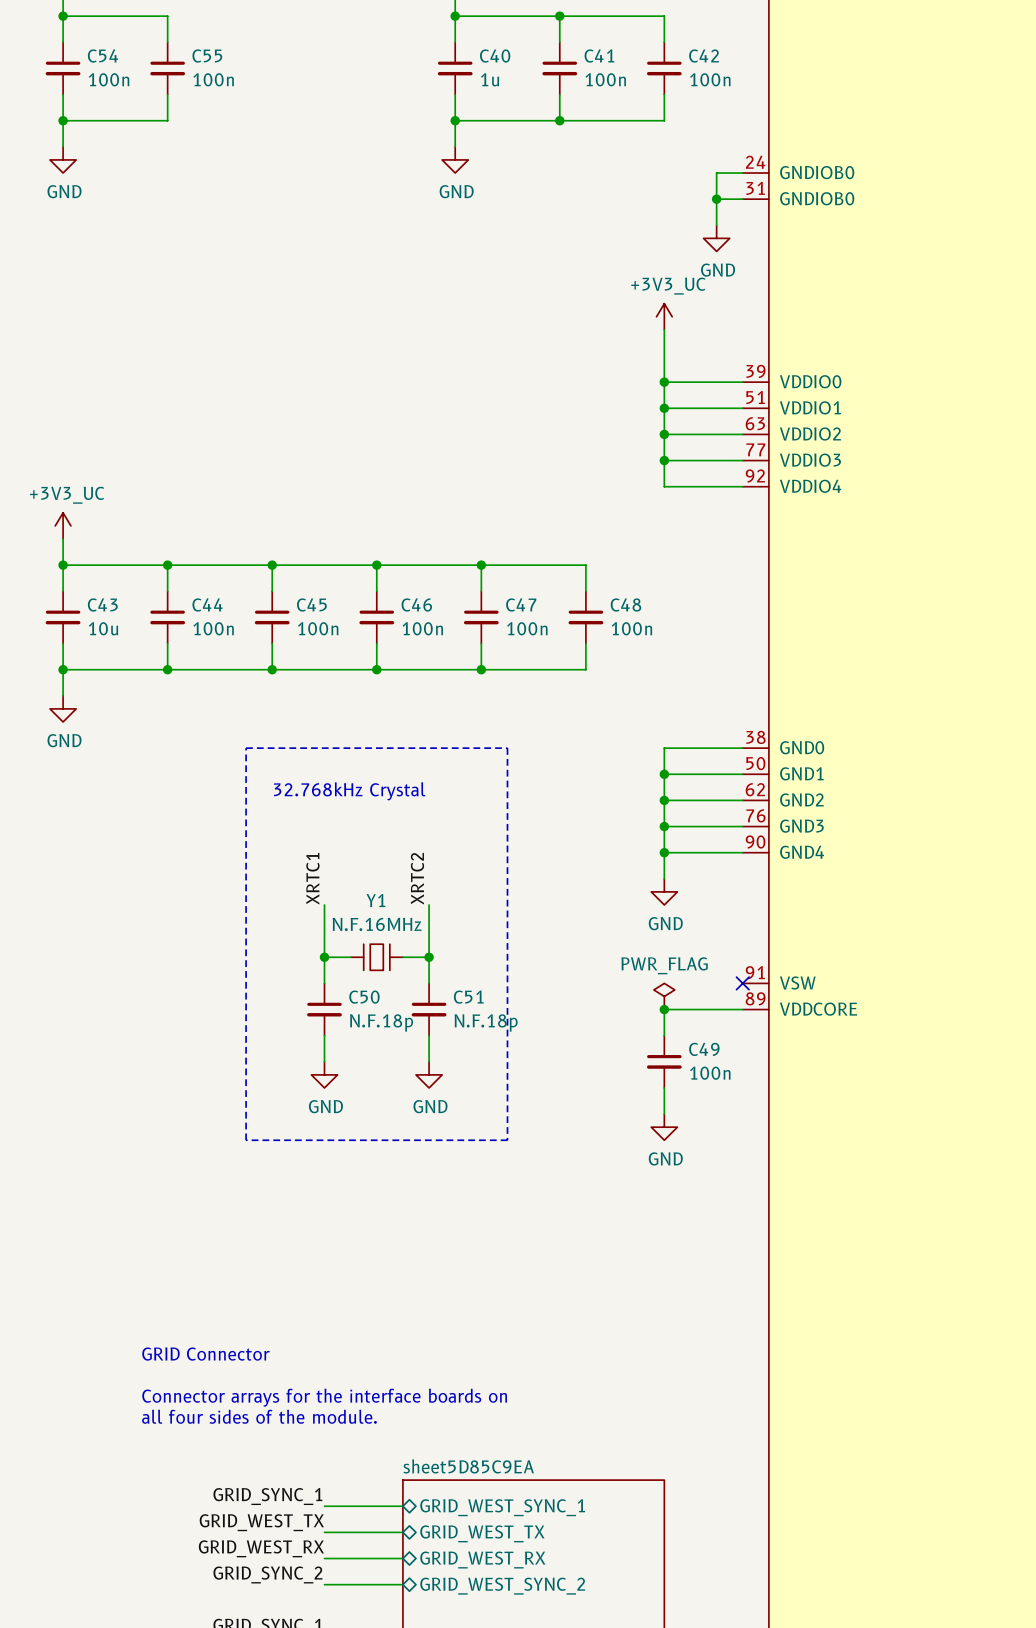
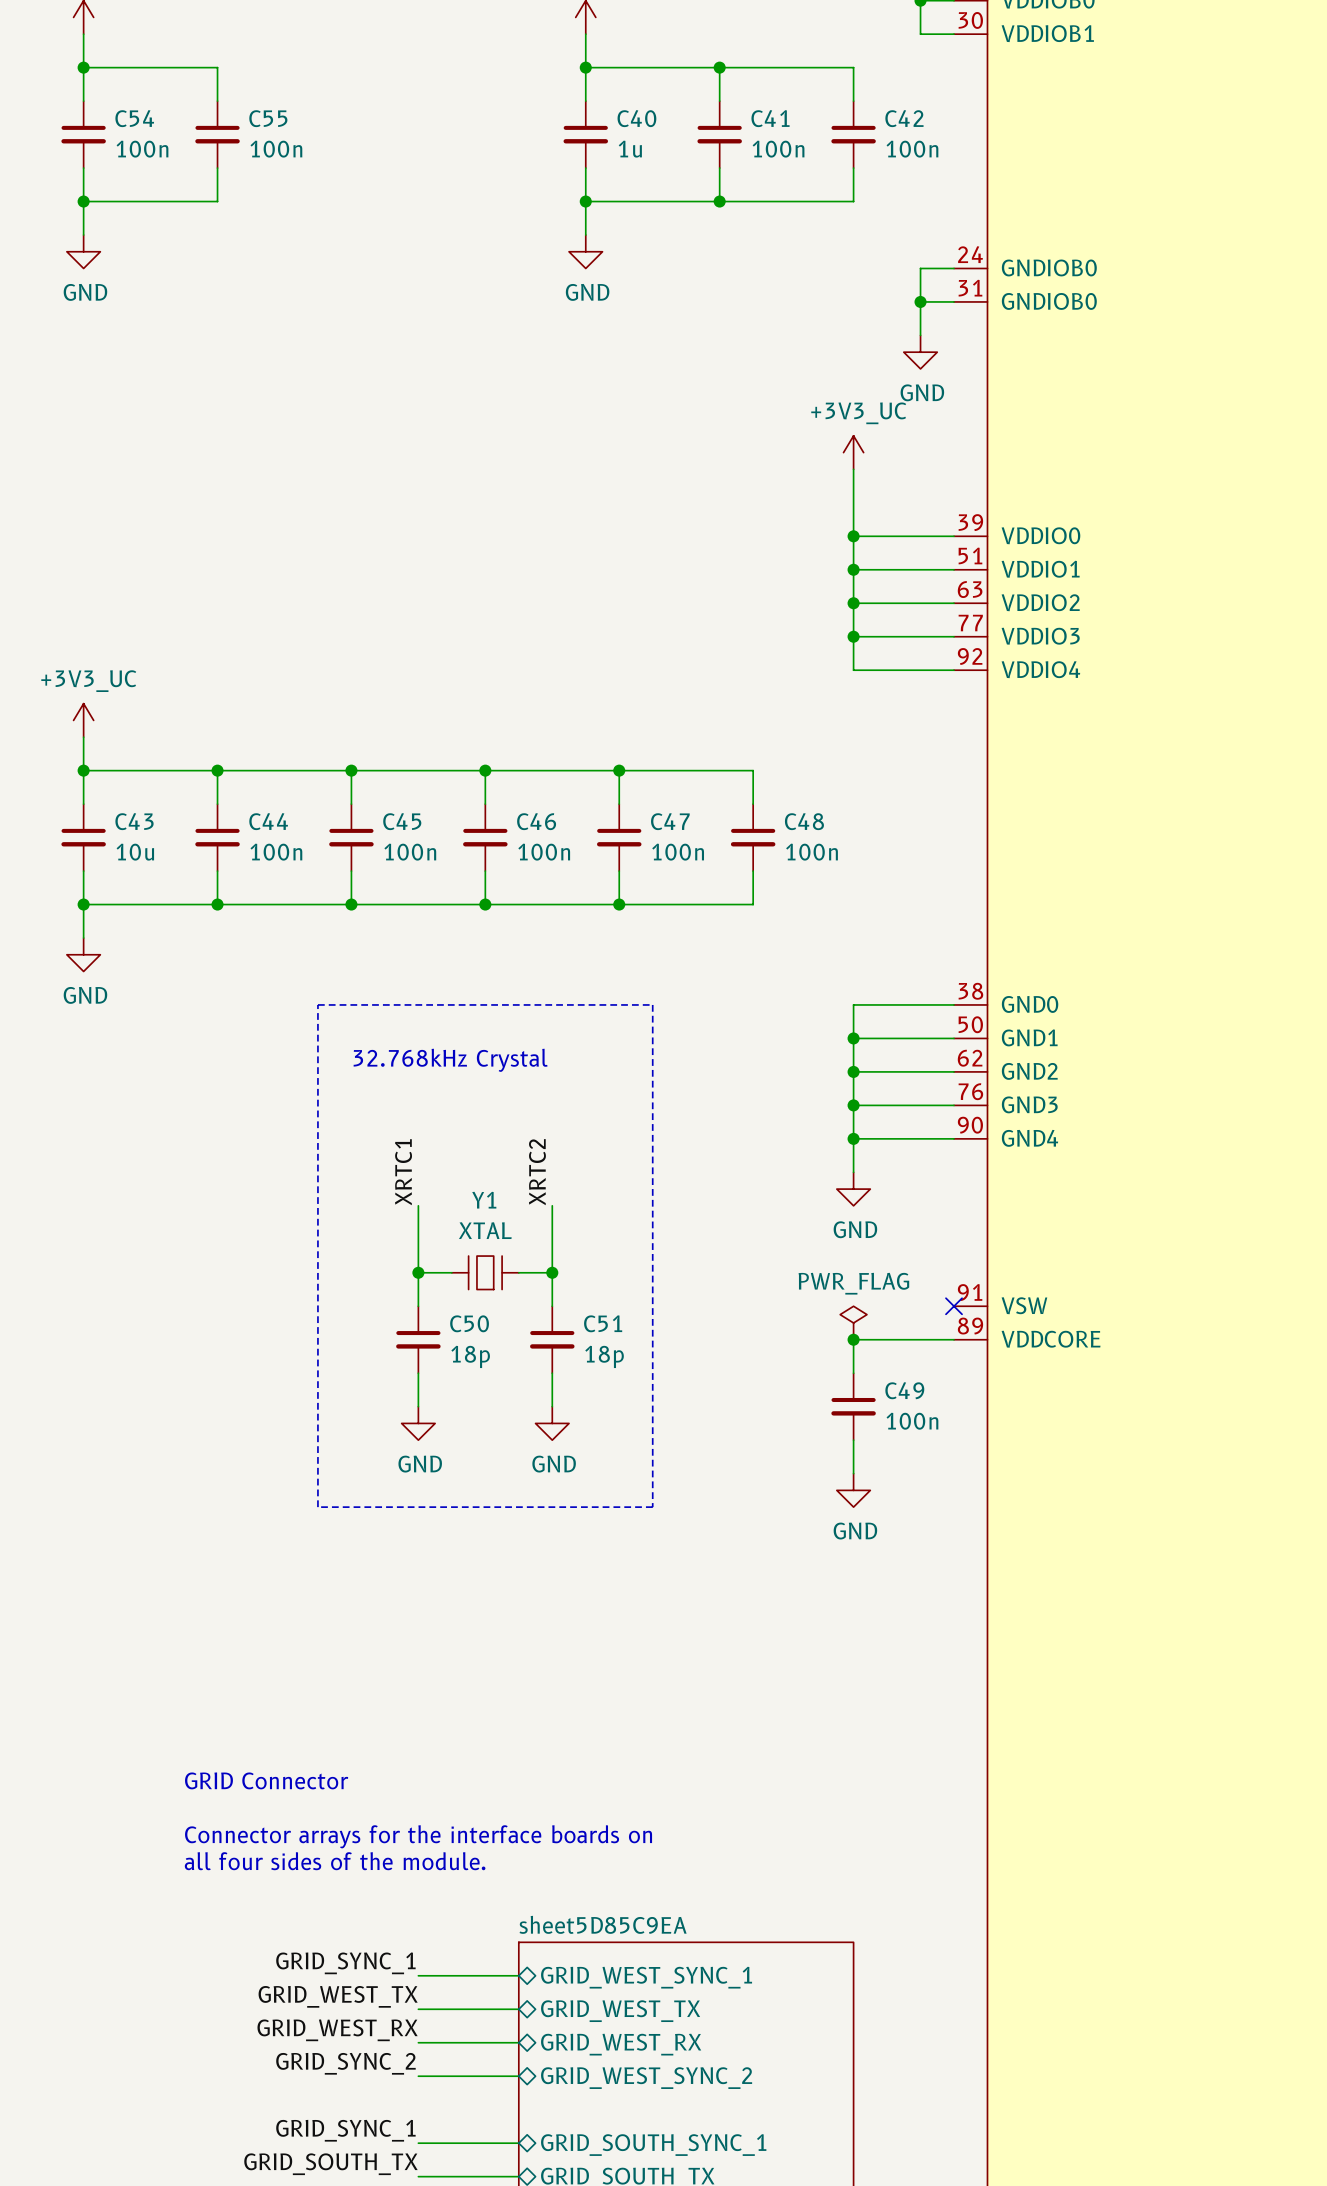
Y1 value: N.F.16MHz (377, 924) -> XTAL (485, 1230)
C50 value: N.F.18p (381, 1022) -> 18p (470, 1356)
C51 value: N.F.18p (486, 1022) -> 18p (604, 1356)

